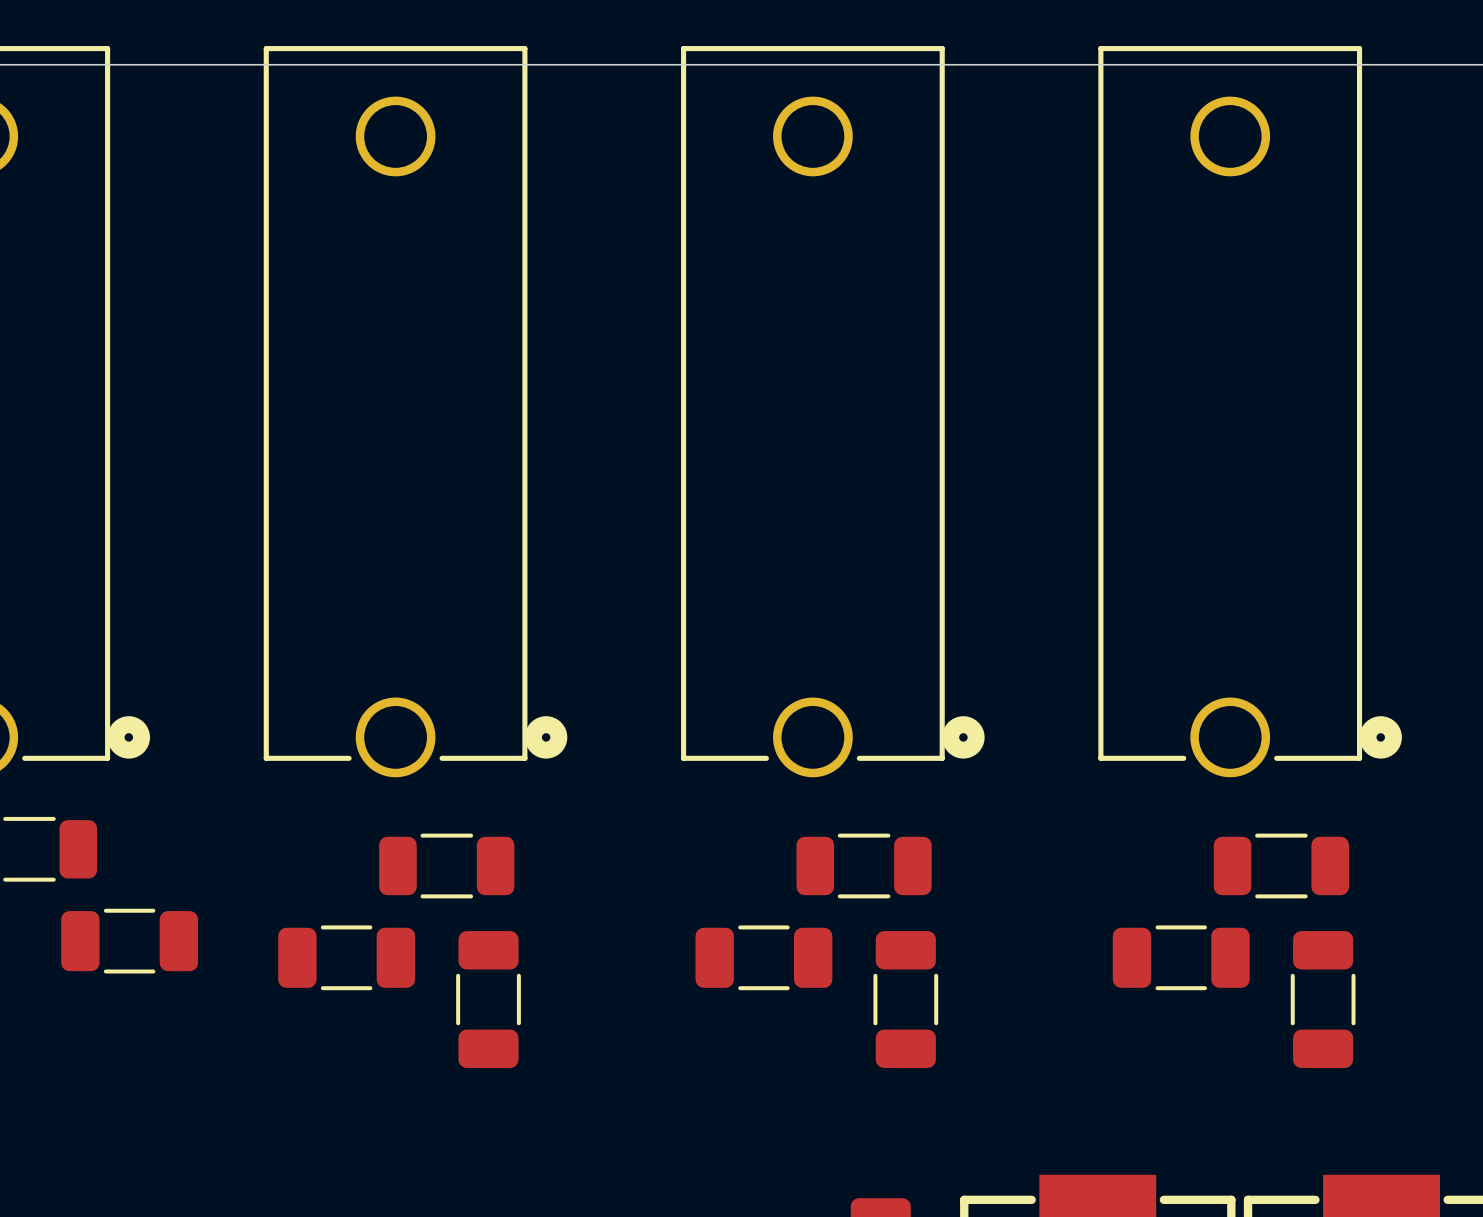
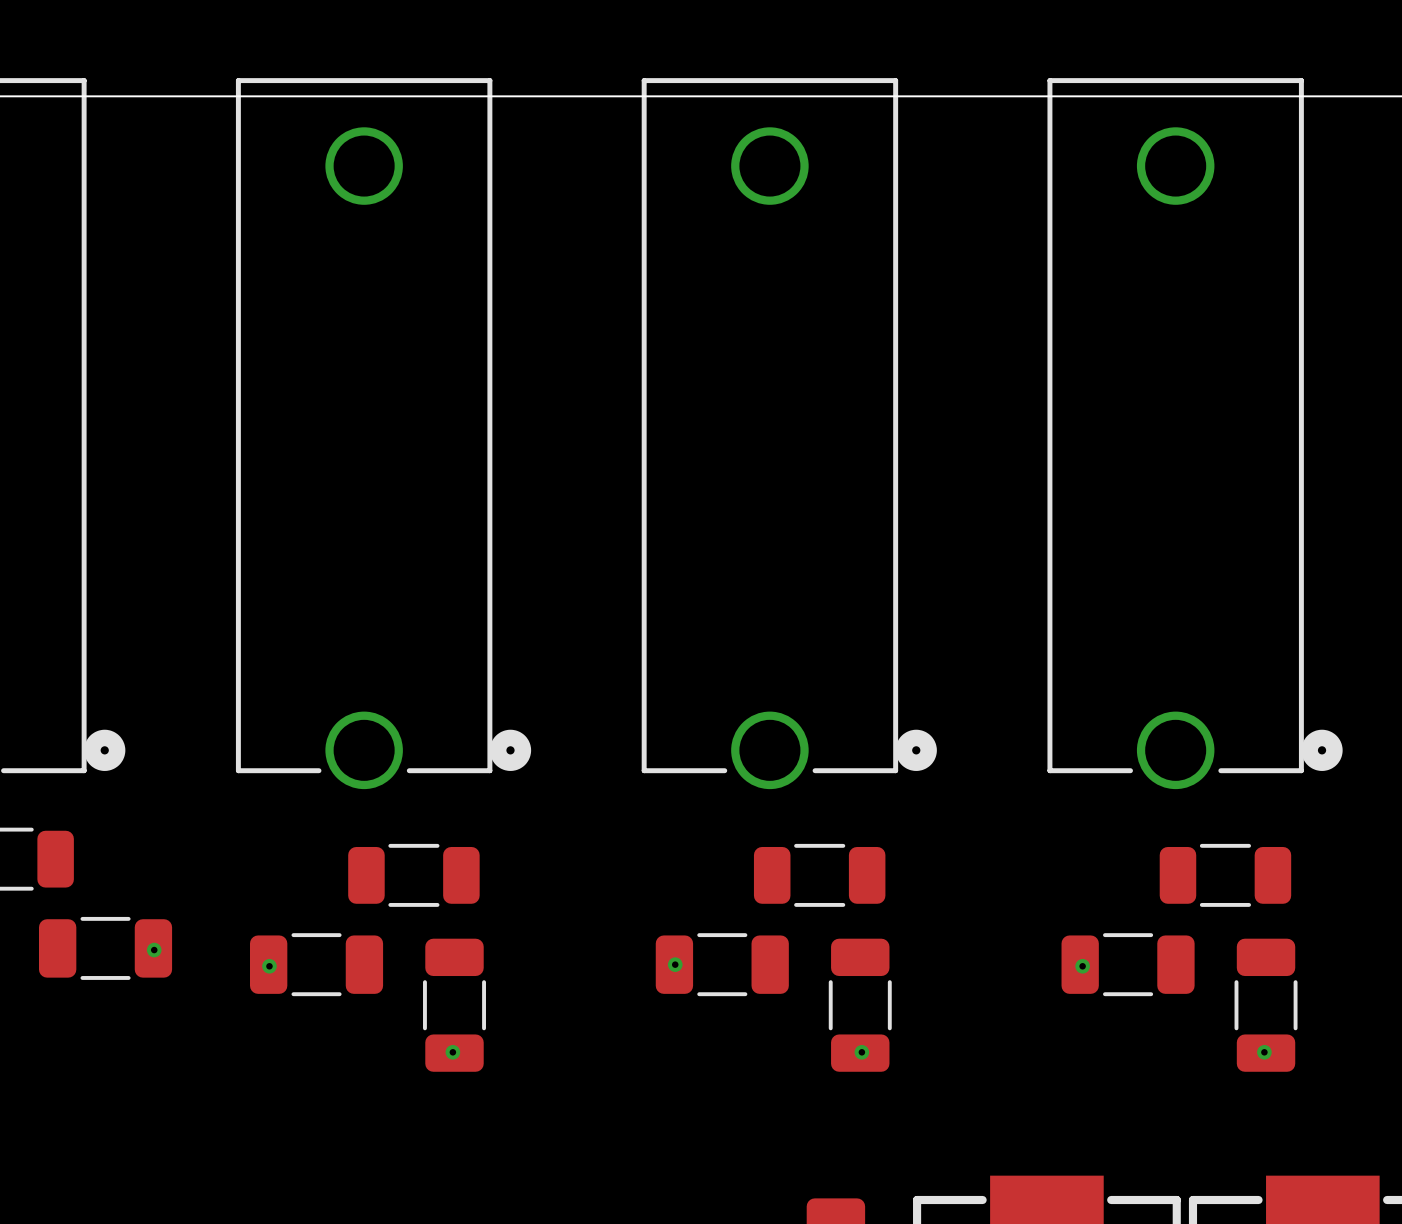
via: none -> (154, 950)
via: none -> (675, 964)
via: none -> (269, 966)
via: none -> (1082, 966)
via: none -> (452, 1052)
via: none -> (861, 1052)
via: none -> (1264, 1052)

